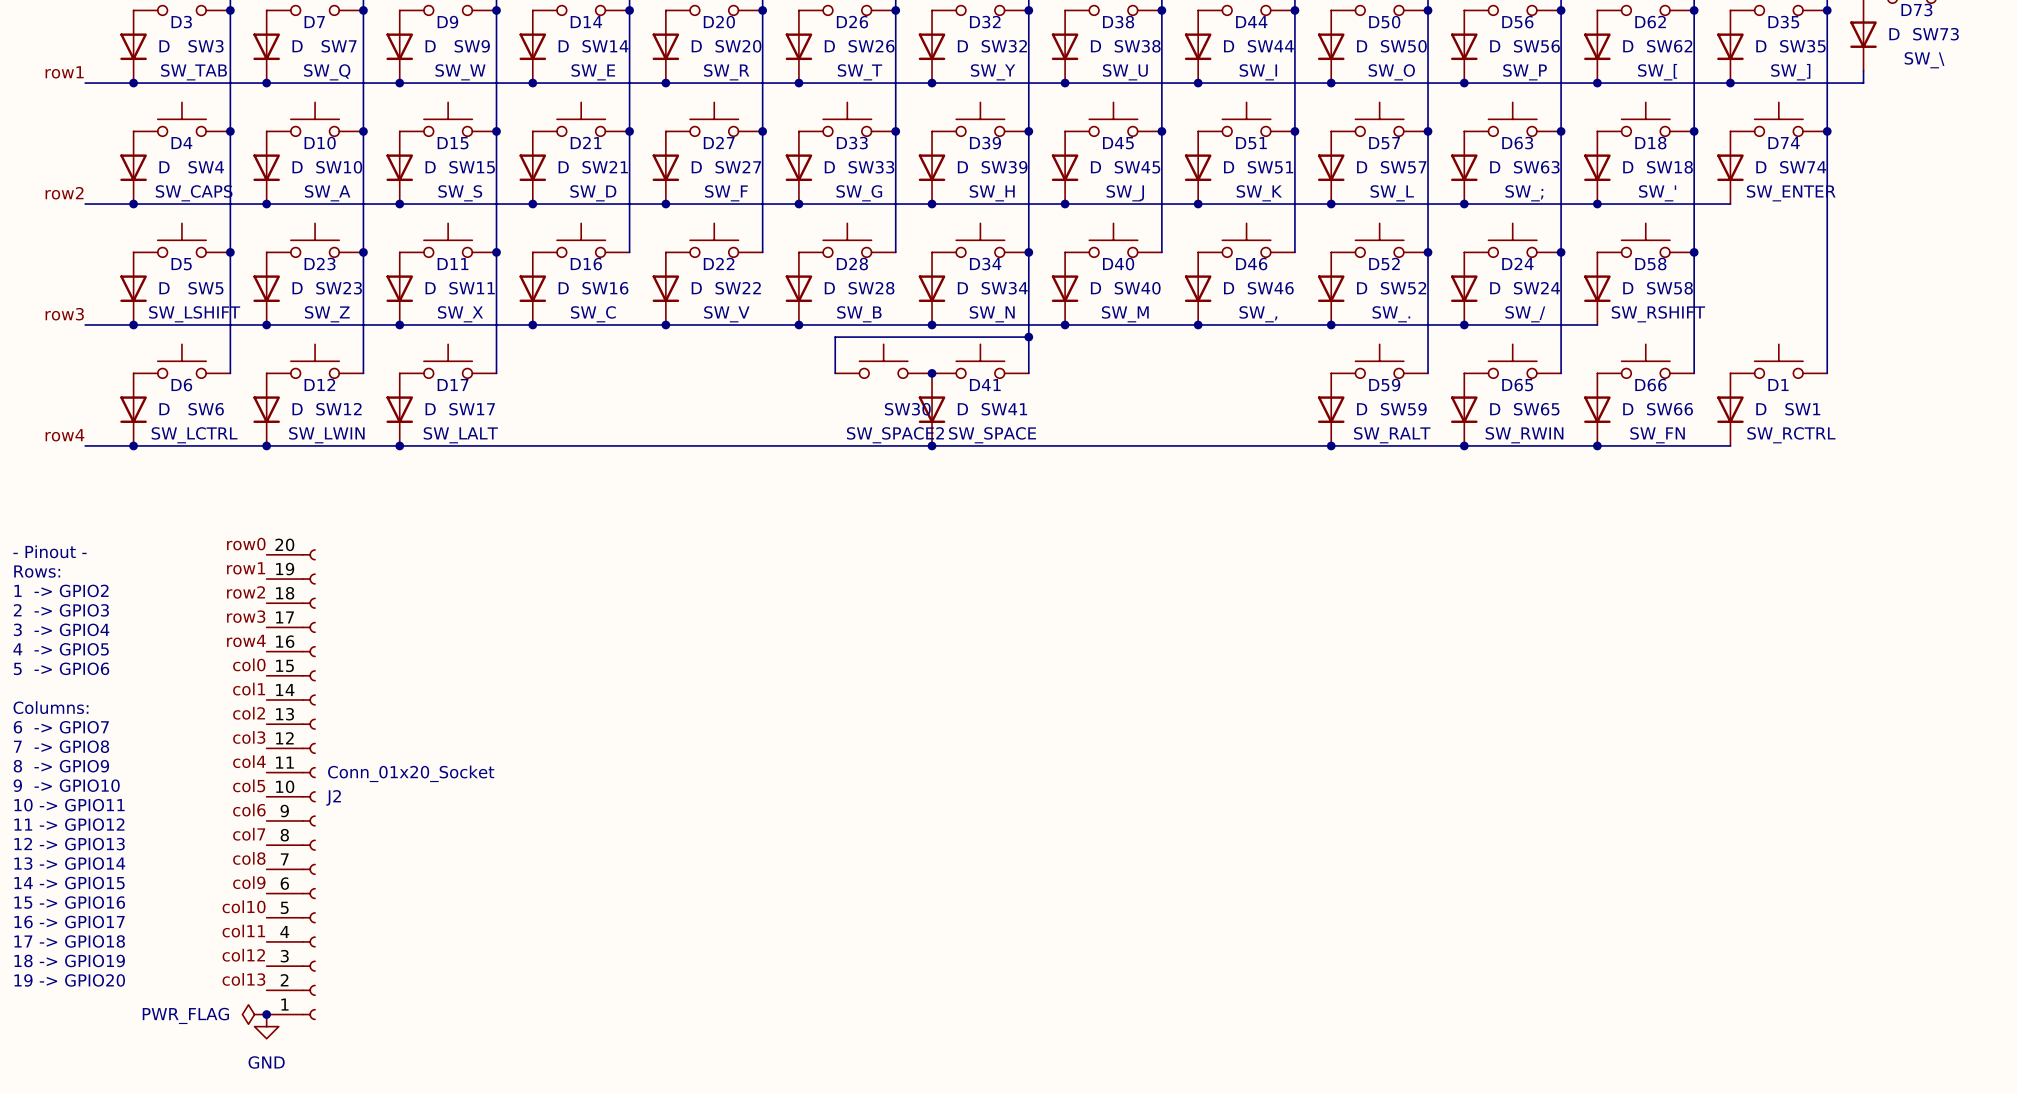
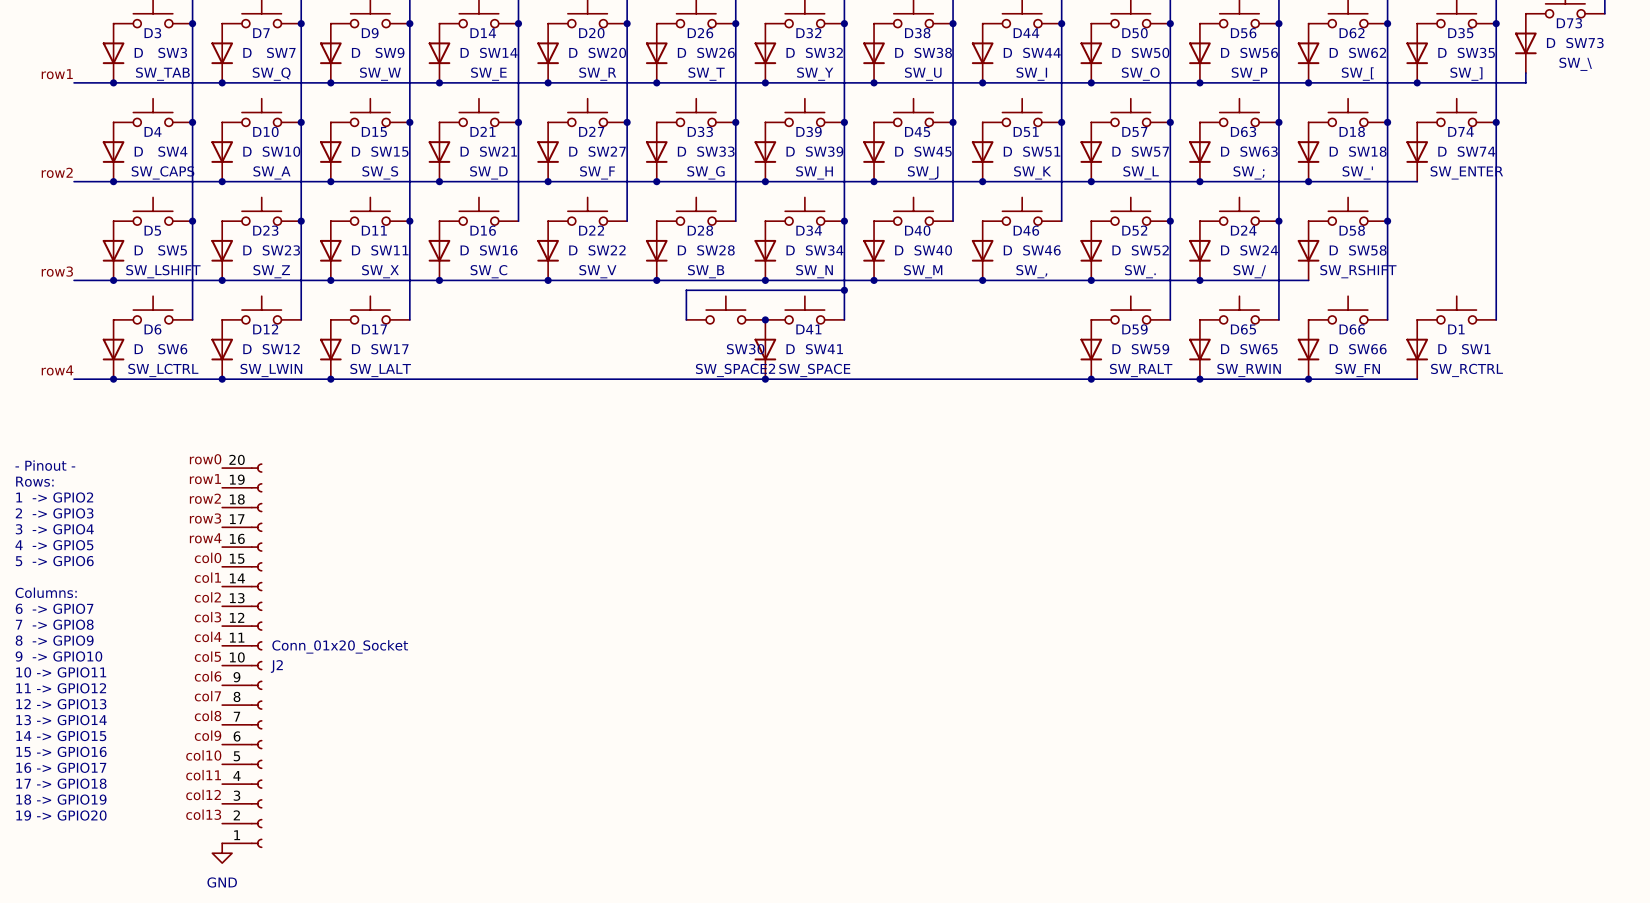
power symbol: PWR_FLAG (254, 1014) -> none
junction: (266, 1014) -> none

